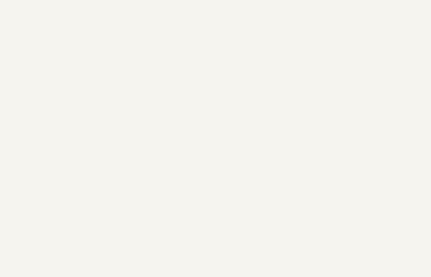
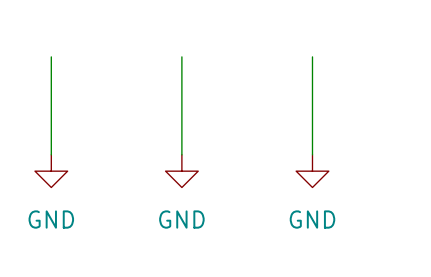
wire: none -> (51, 56) (51, 154)
wire: none -> (181, 56) (181, 154)
wire: none -> (312, 56) (312, 154)
power symbol: none -> GND (51, 171)
power symbol: none -> GND (181, 171)
power symbol: none -> GND (312, 171)

